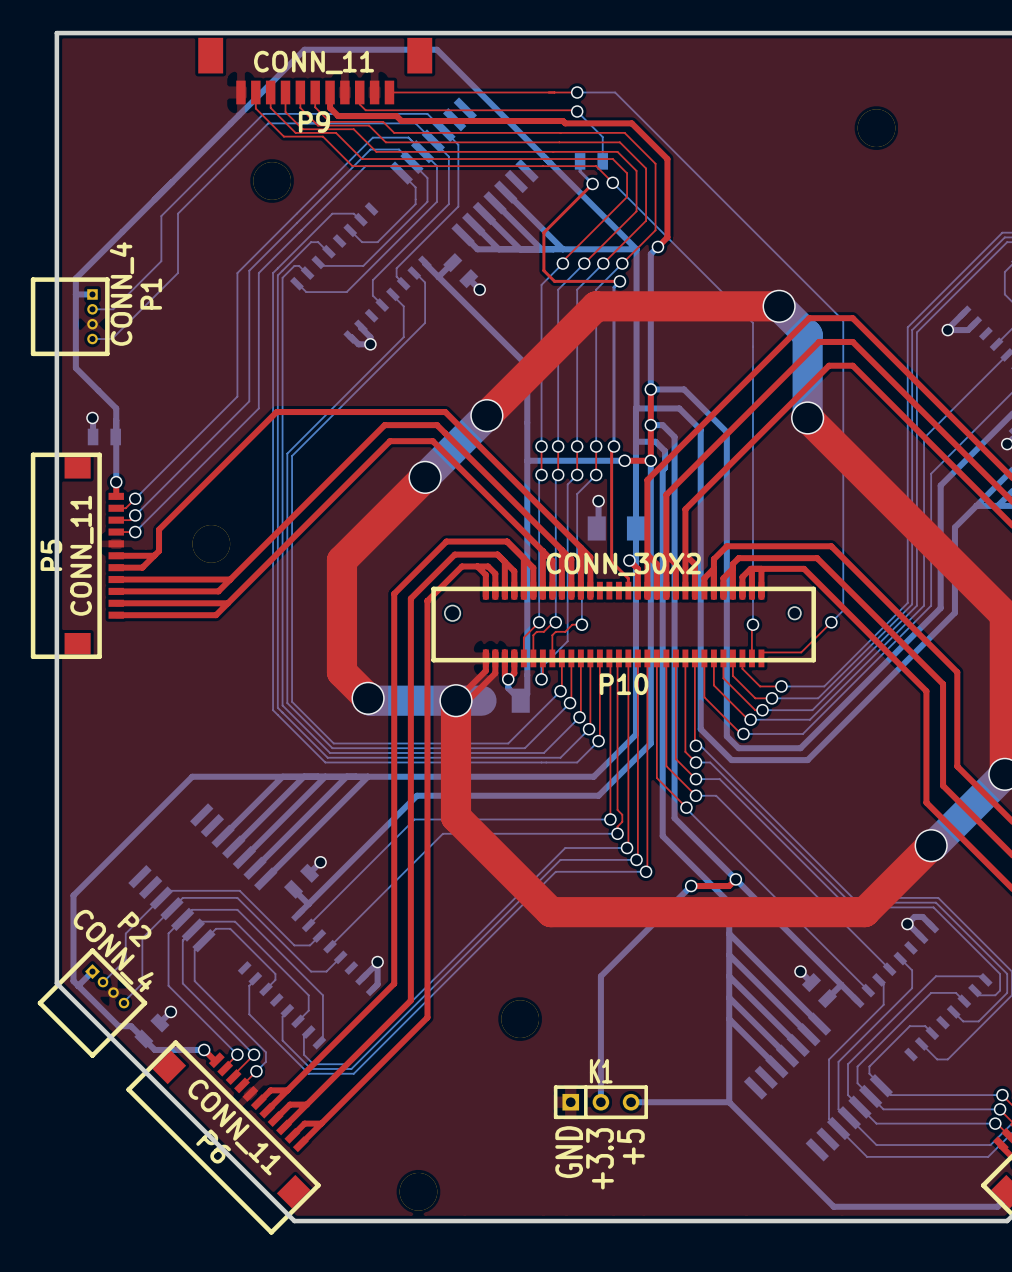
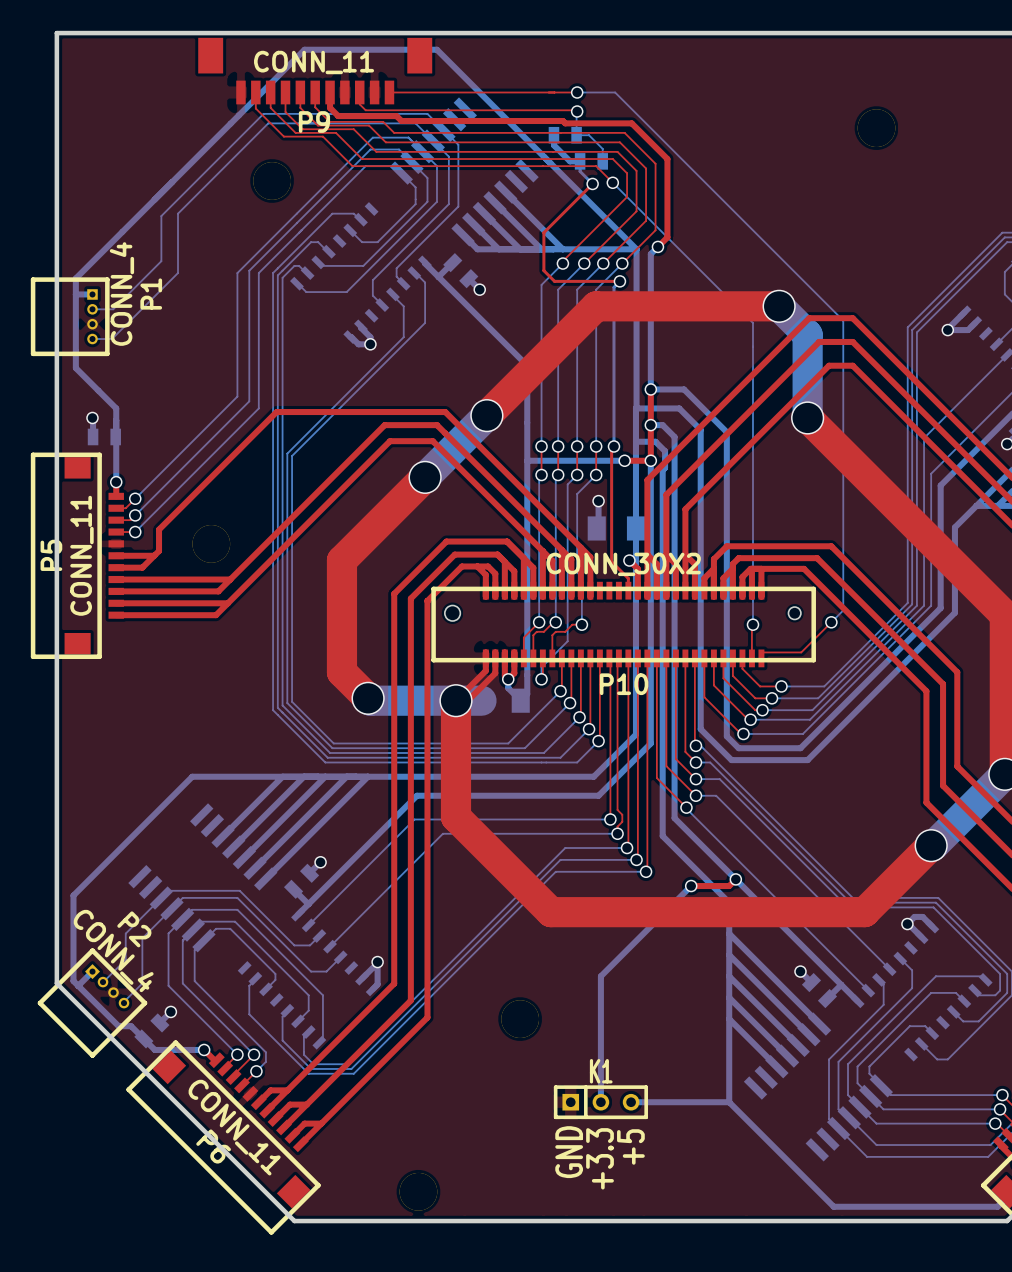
bottom track: (577, 111) (602, 137) (602, 148) -> (577, 111) (576, 135) (589, 135) (602, 148)
bottom track: none -> (553, 135) (553, 145) (570, 161) (580, 161)
part: none -> (565, 135)

